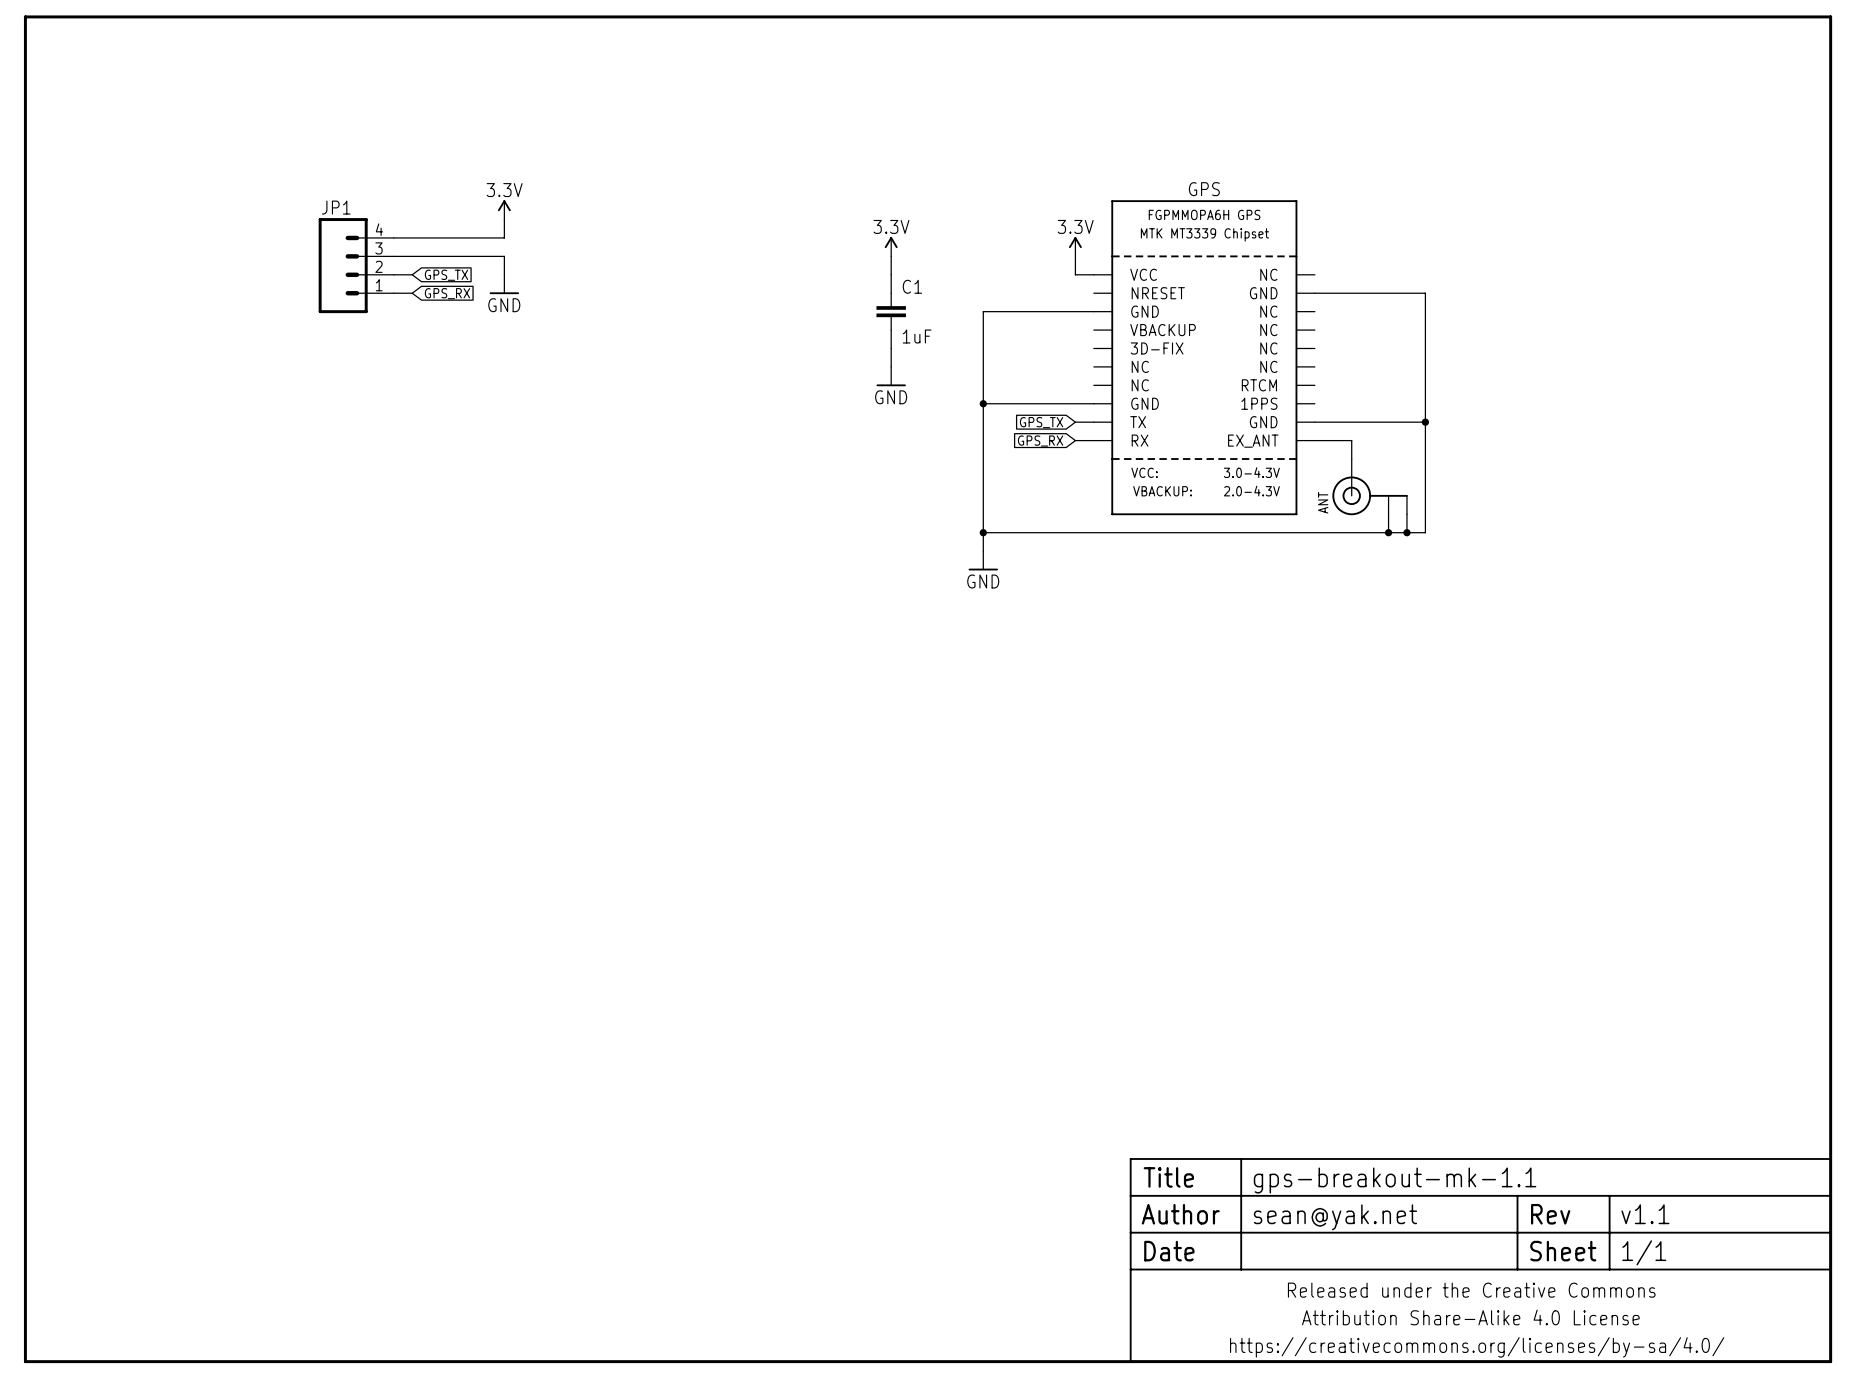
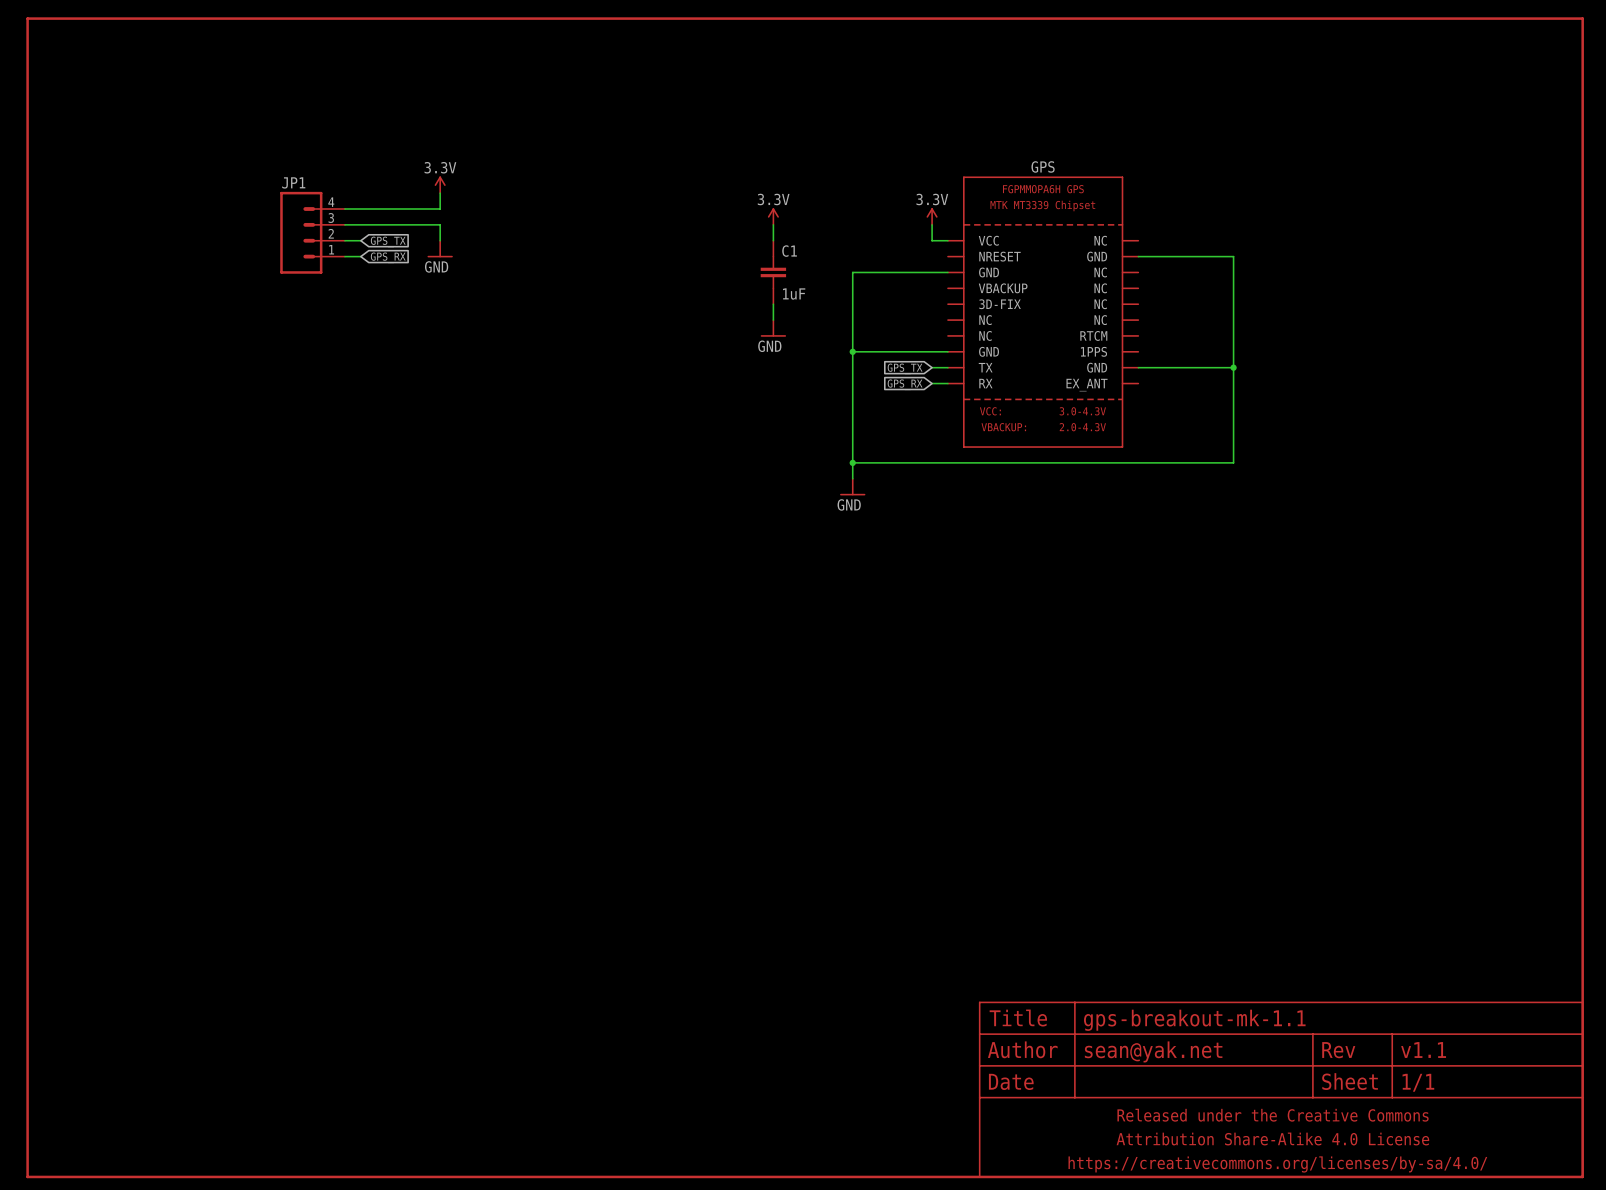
wire: (1314, 440) (1351, 440) (1351, 459) -> none
ANT: (1370, 487) -> none
wire: (1388, 514) (1388, 532) -> none
wire: (1406, 514) (1406, 532) -> none
junction: (1388, 532) -> none
junction: (1406, 532) -> none

